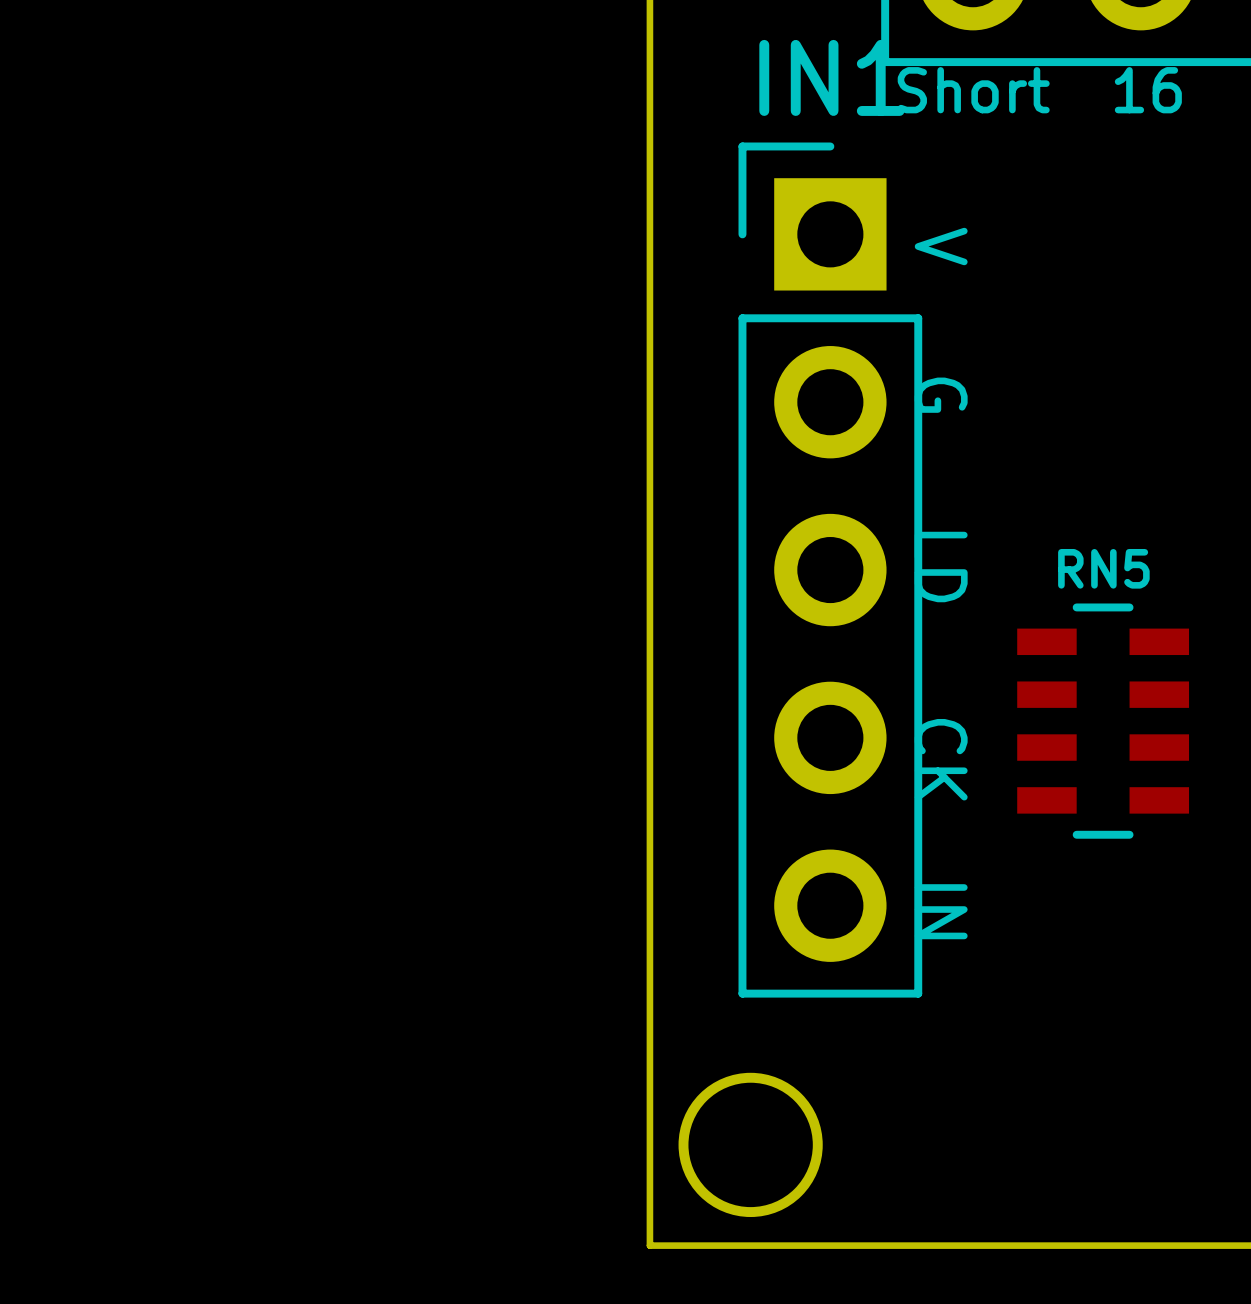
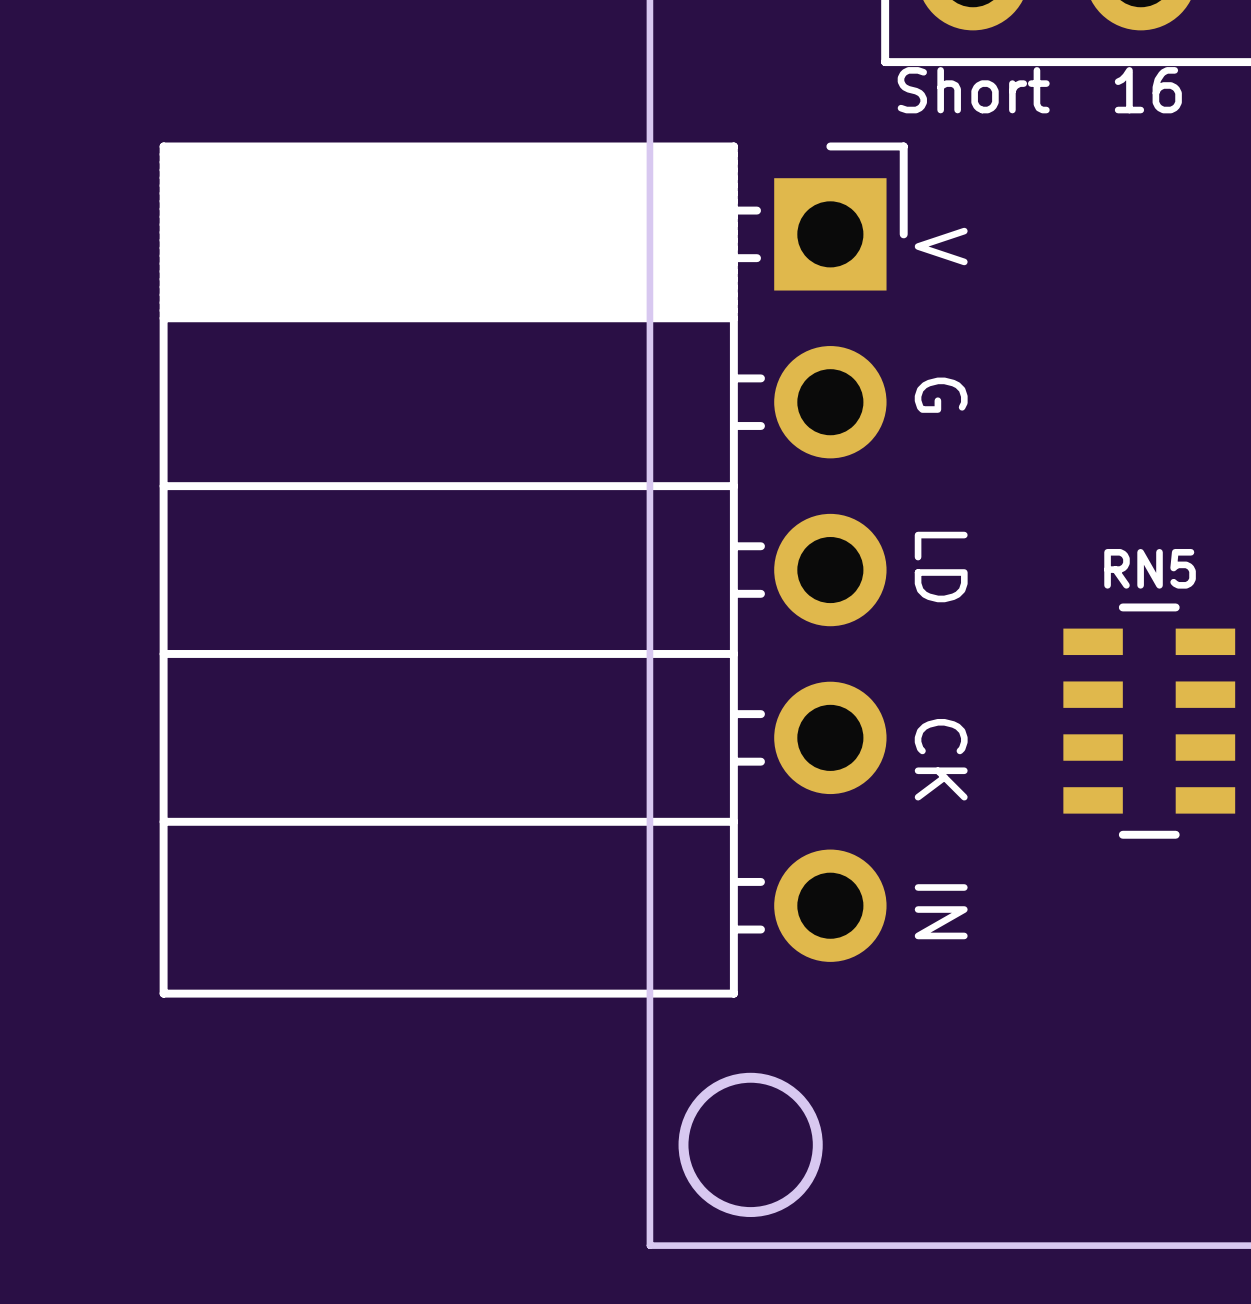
part: none -> (533, 570)
IN1: (830, 570) -> none
RN5 position: (1103, 721) -> (1149, 721)

